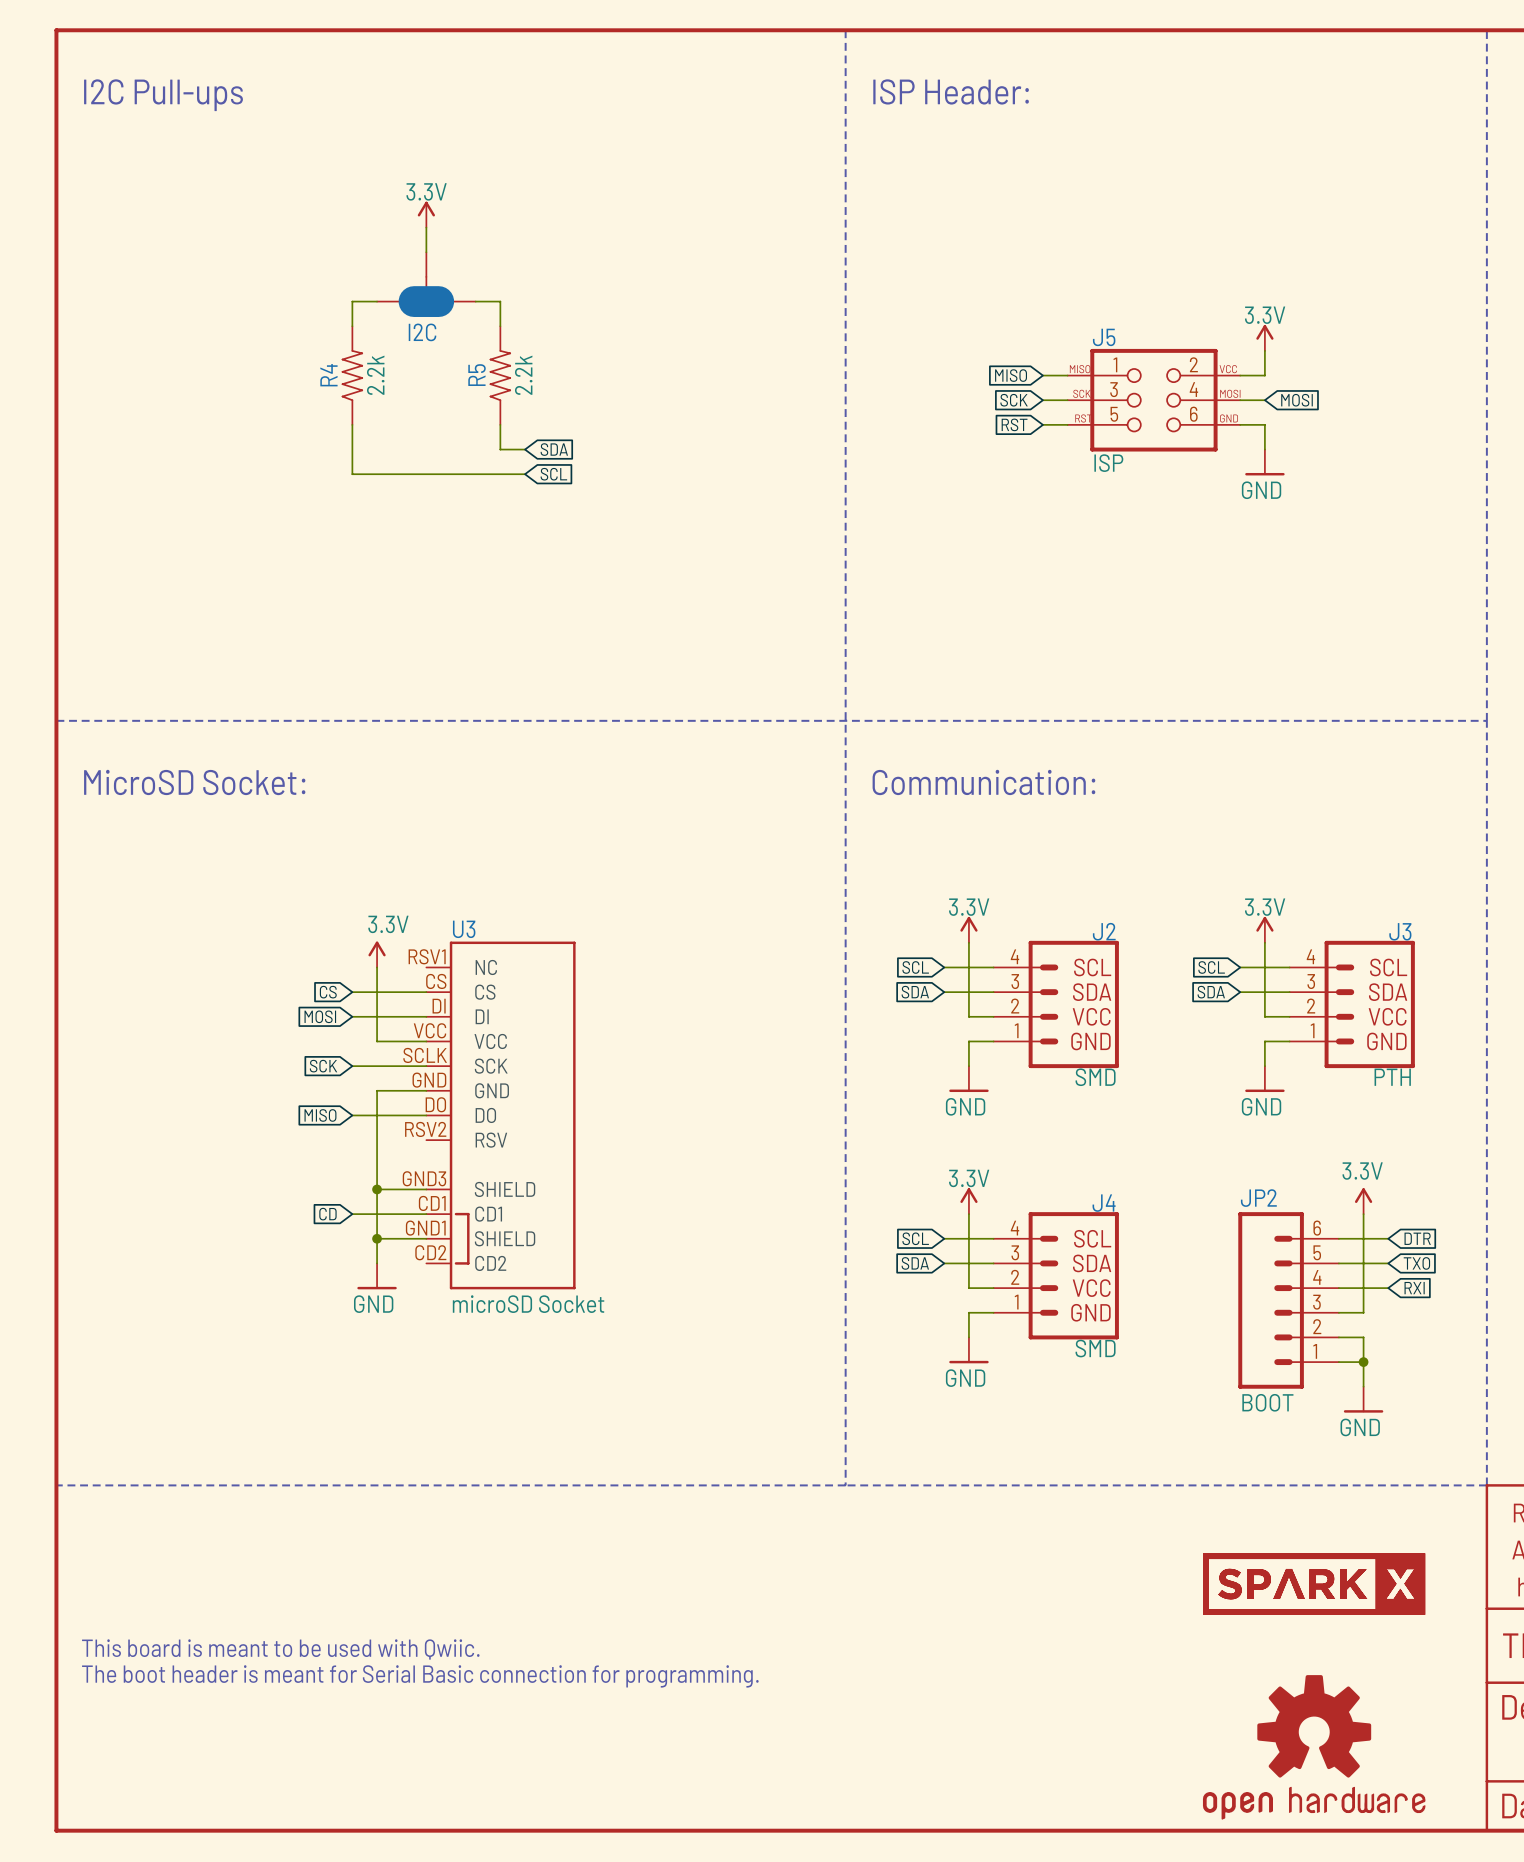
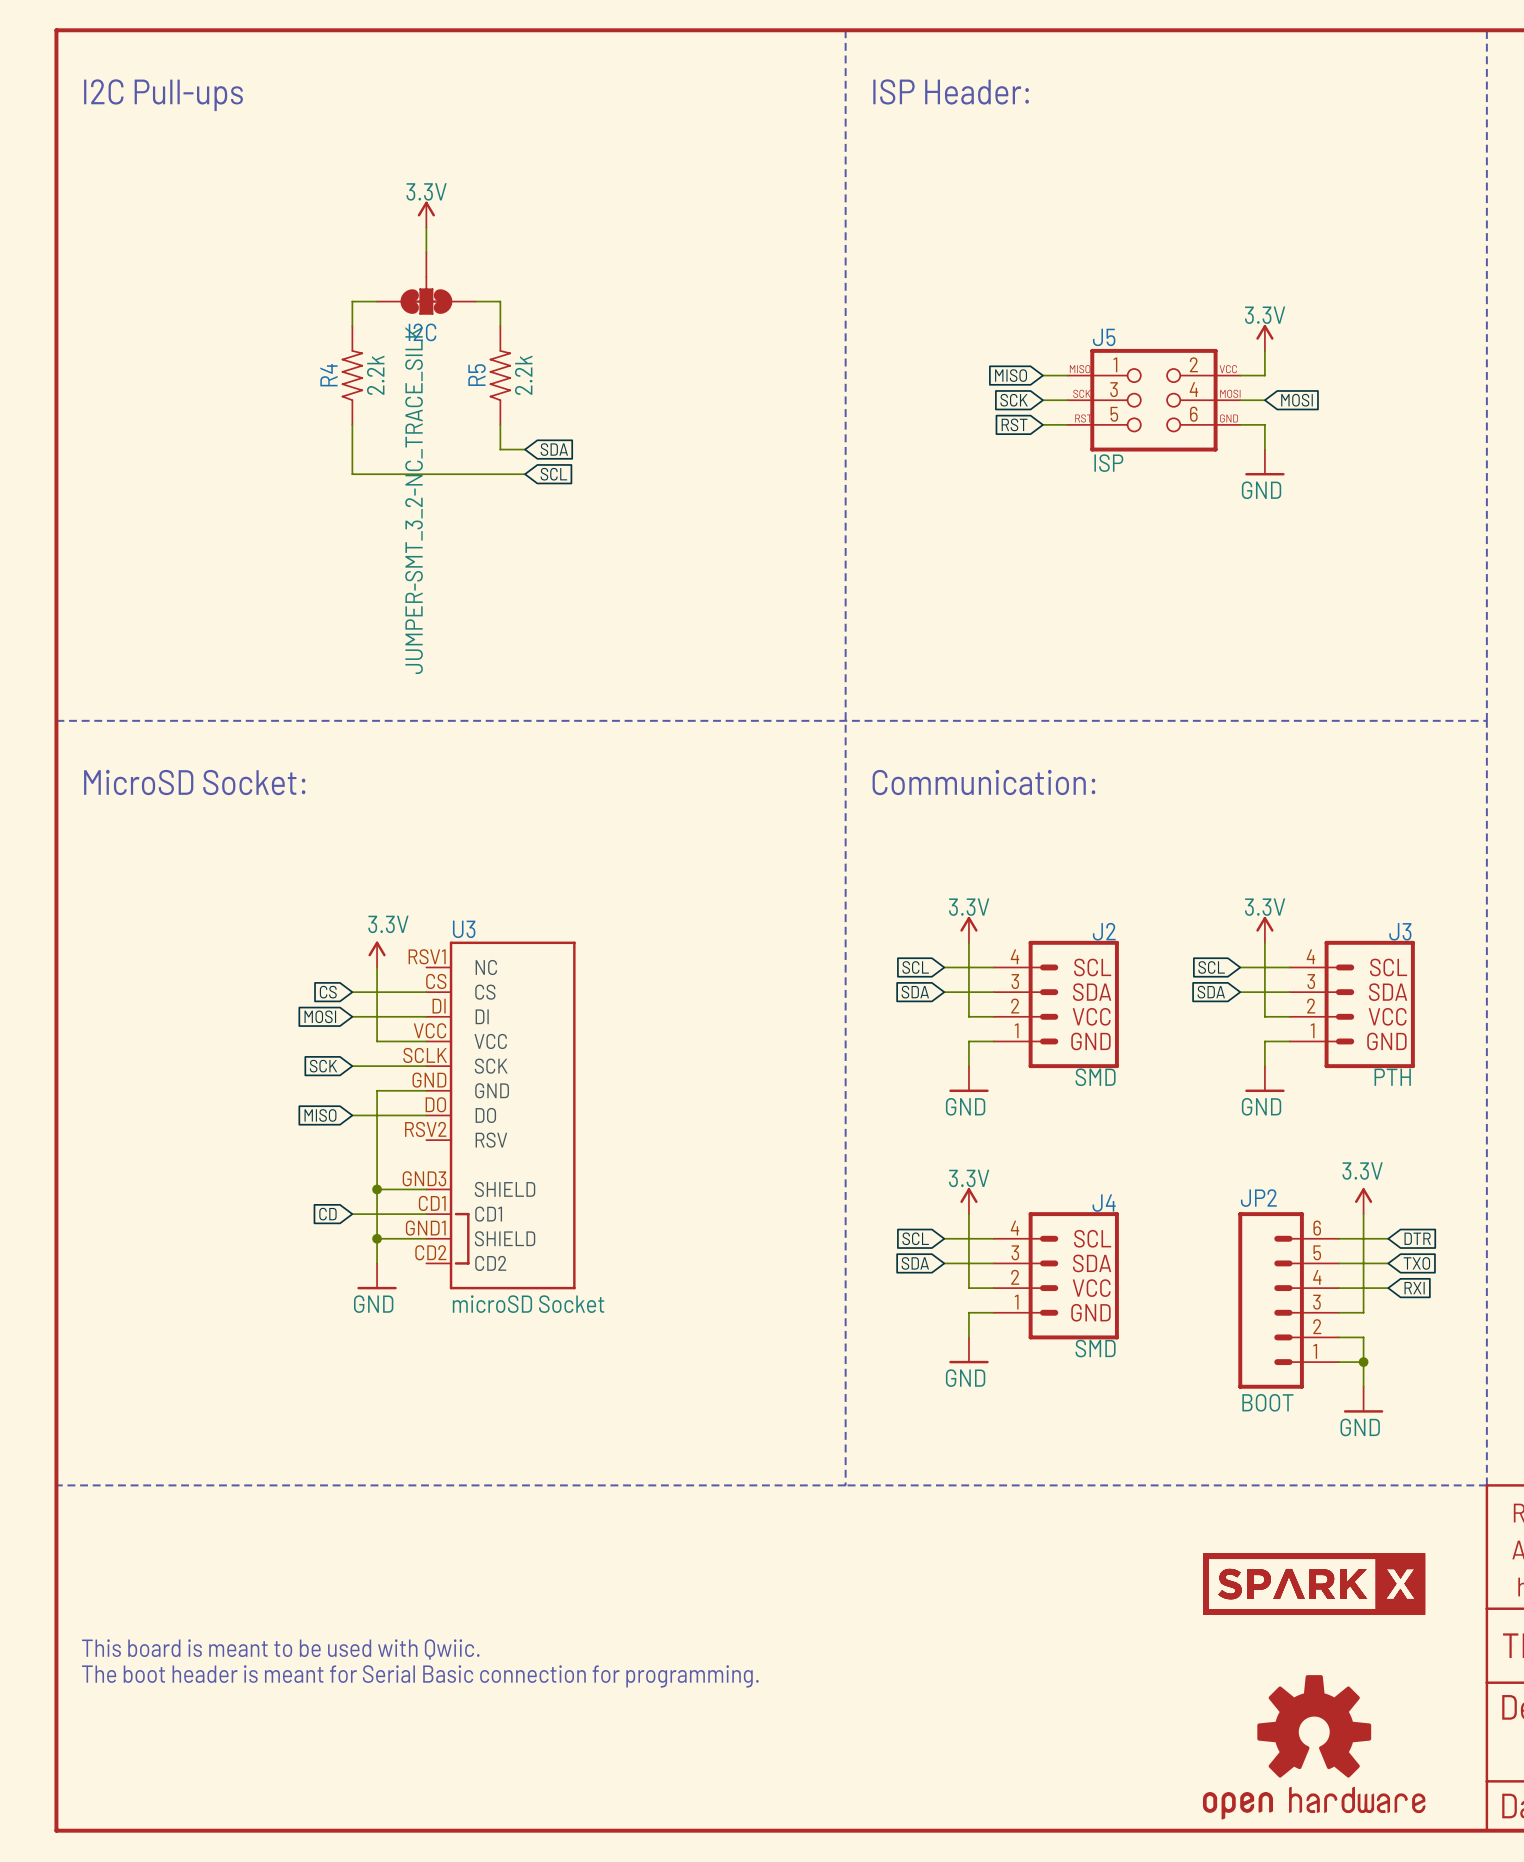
I2C symbol: [377, 252, 476, 317] -> [377, 252, 476, 315]
I2C value: none -> JUMPER-SMT_3_2-NC_TRACE_SILK (414, 500)

